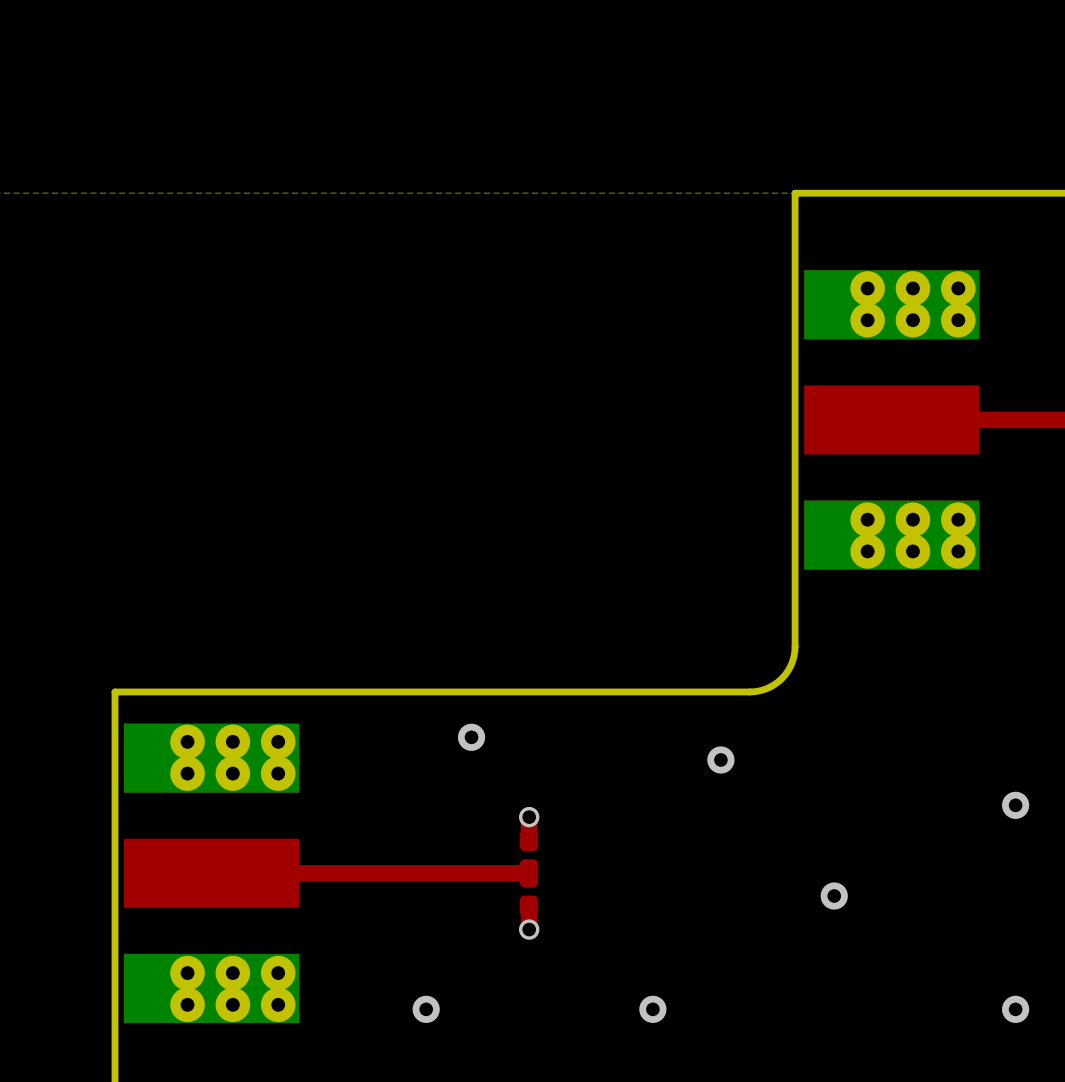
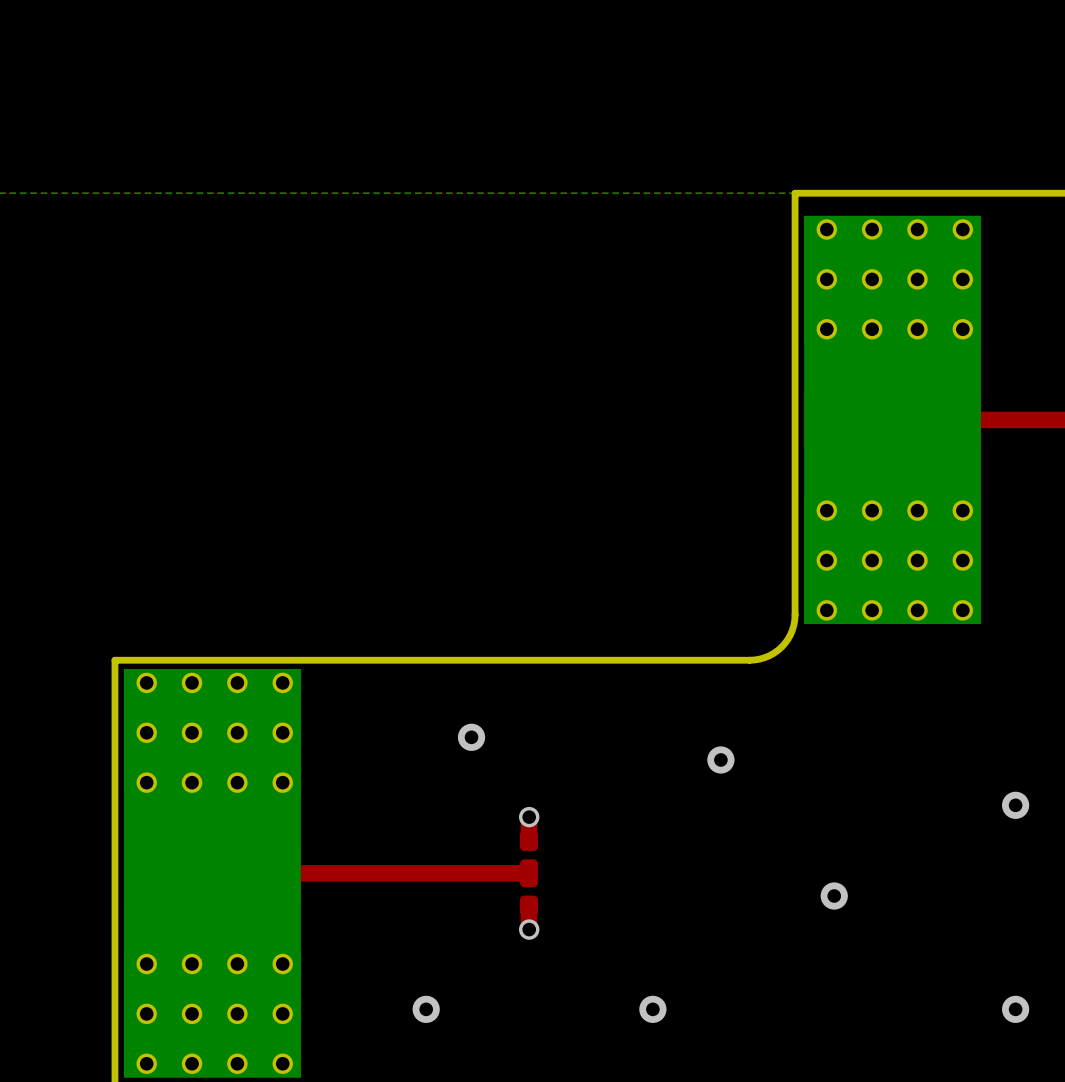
part footprint: [804, 270, 980, 570] -> [804, 215, 981, 624]
board edge: (795, 614) (794, 651) (790, 666) (778, 682) (769, 687) (754, 691) (114, 691) -> (795, 614) (792, 629) (785, 643) (769, 655) (754, 659) (114, 660) (114, 691)
part footprint: [124, 723, 300, 1024] -> [124, 669, 301, 1078]

